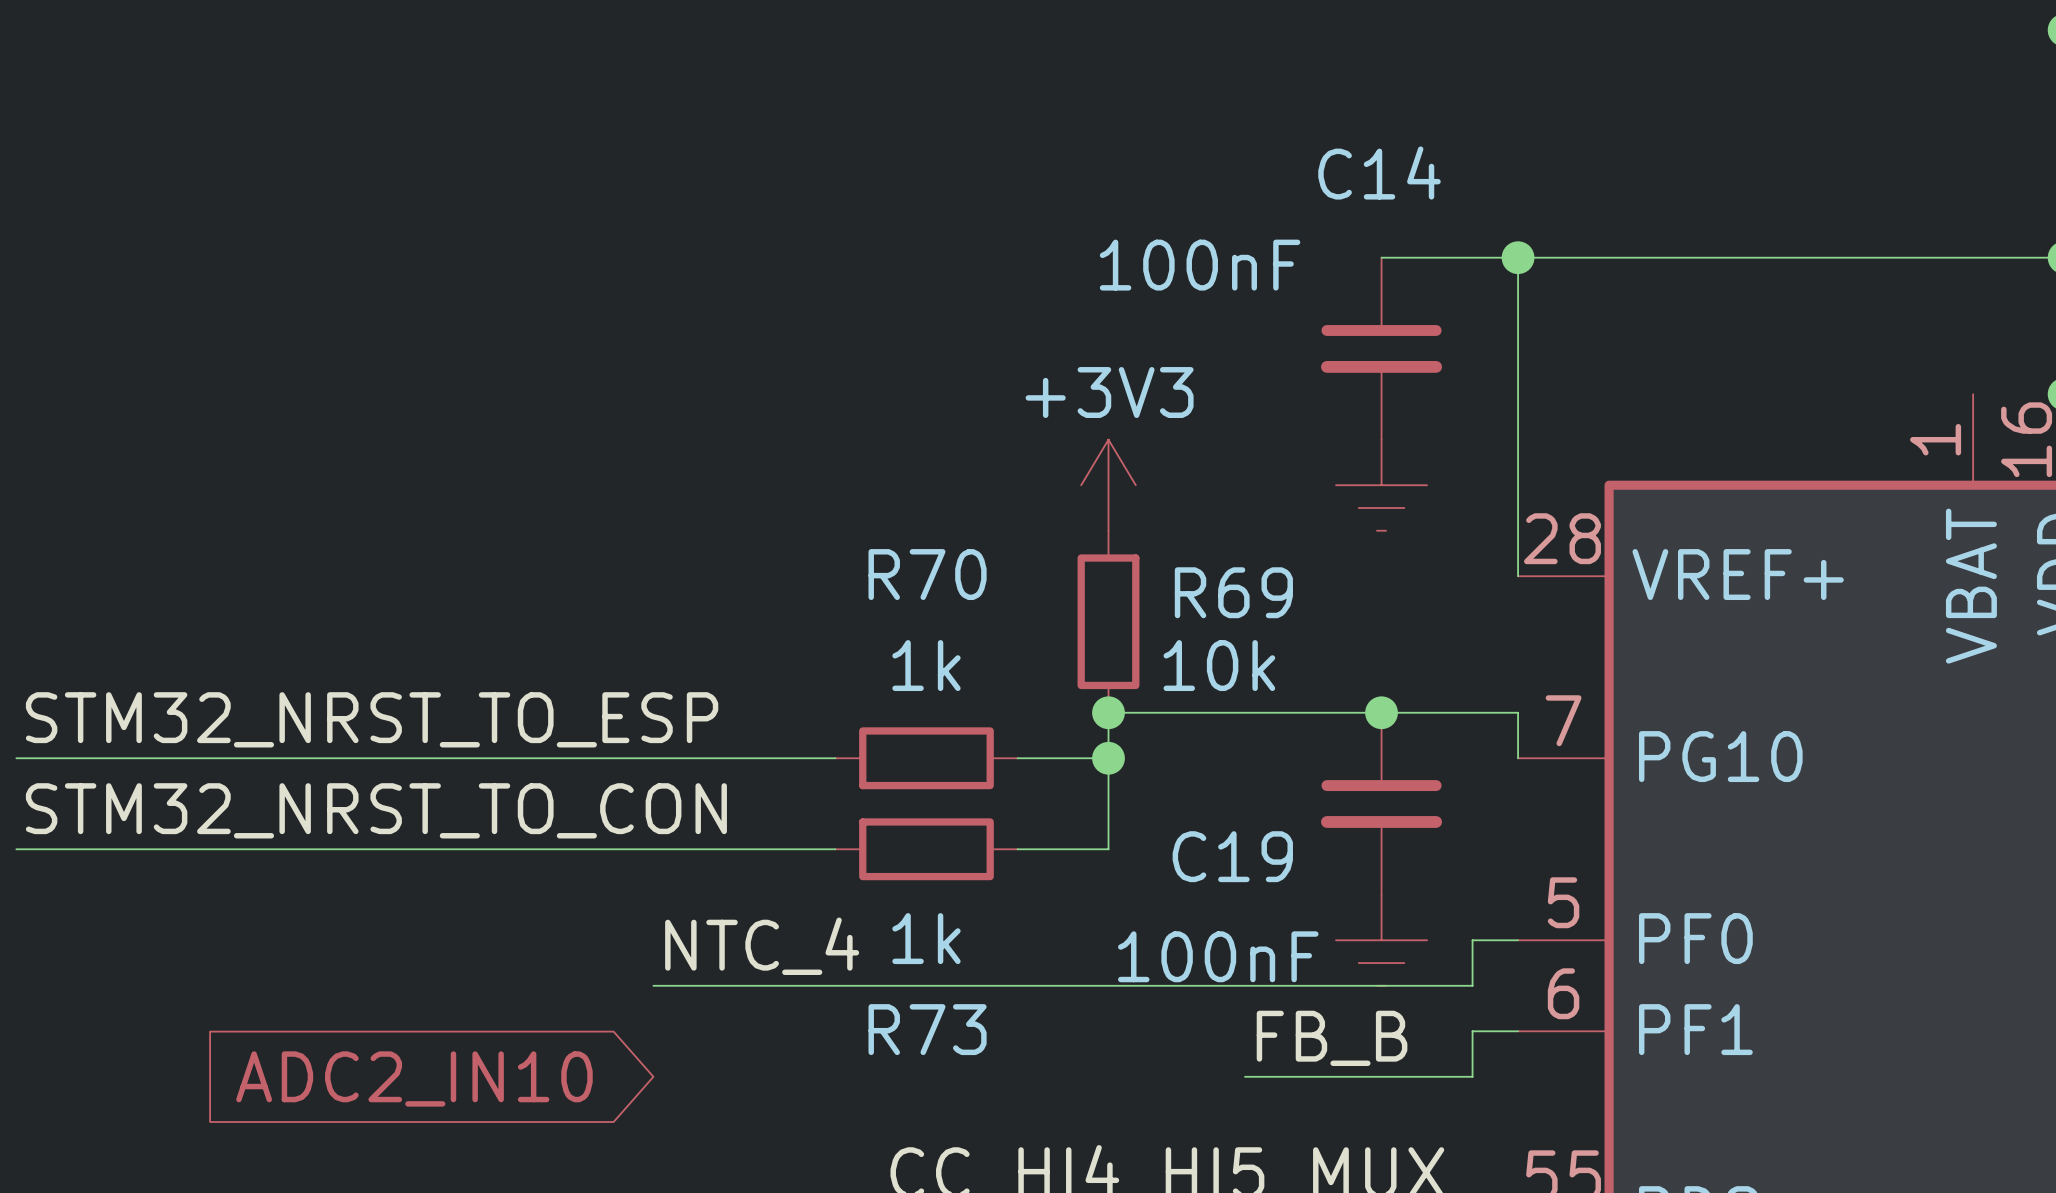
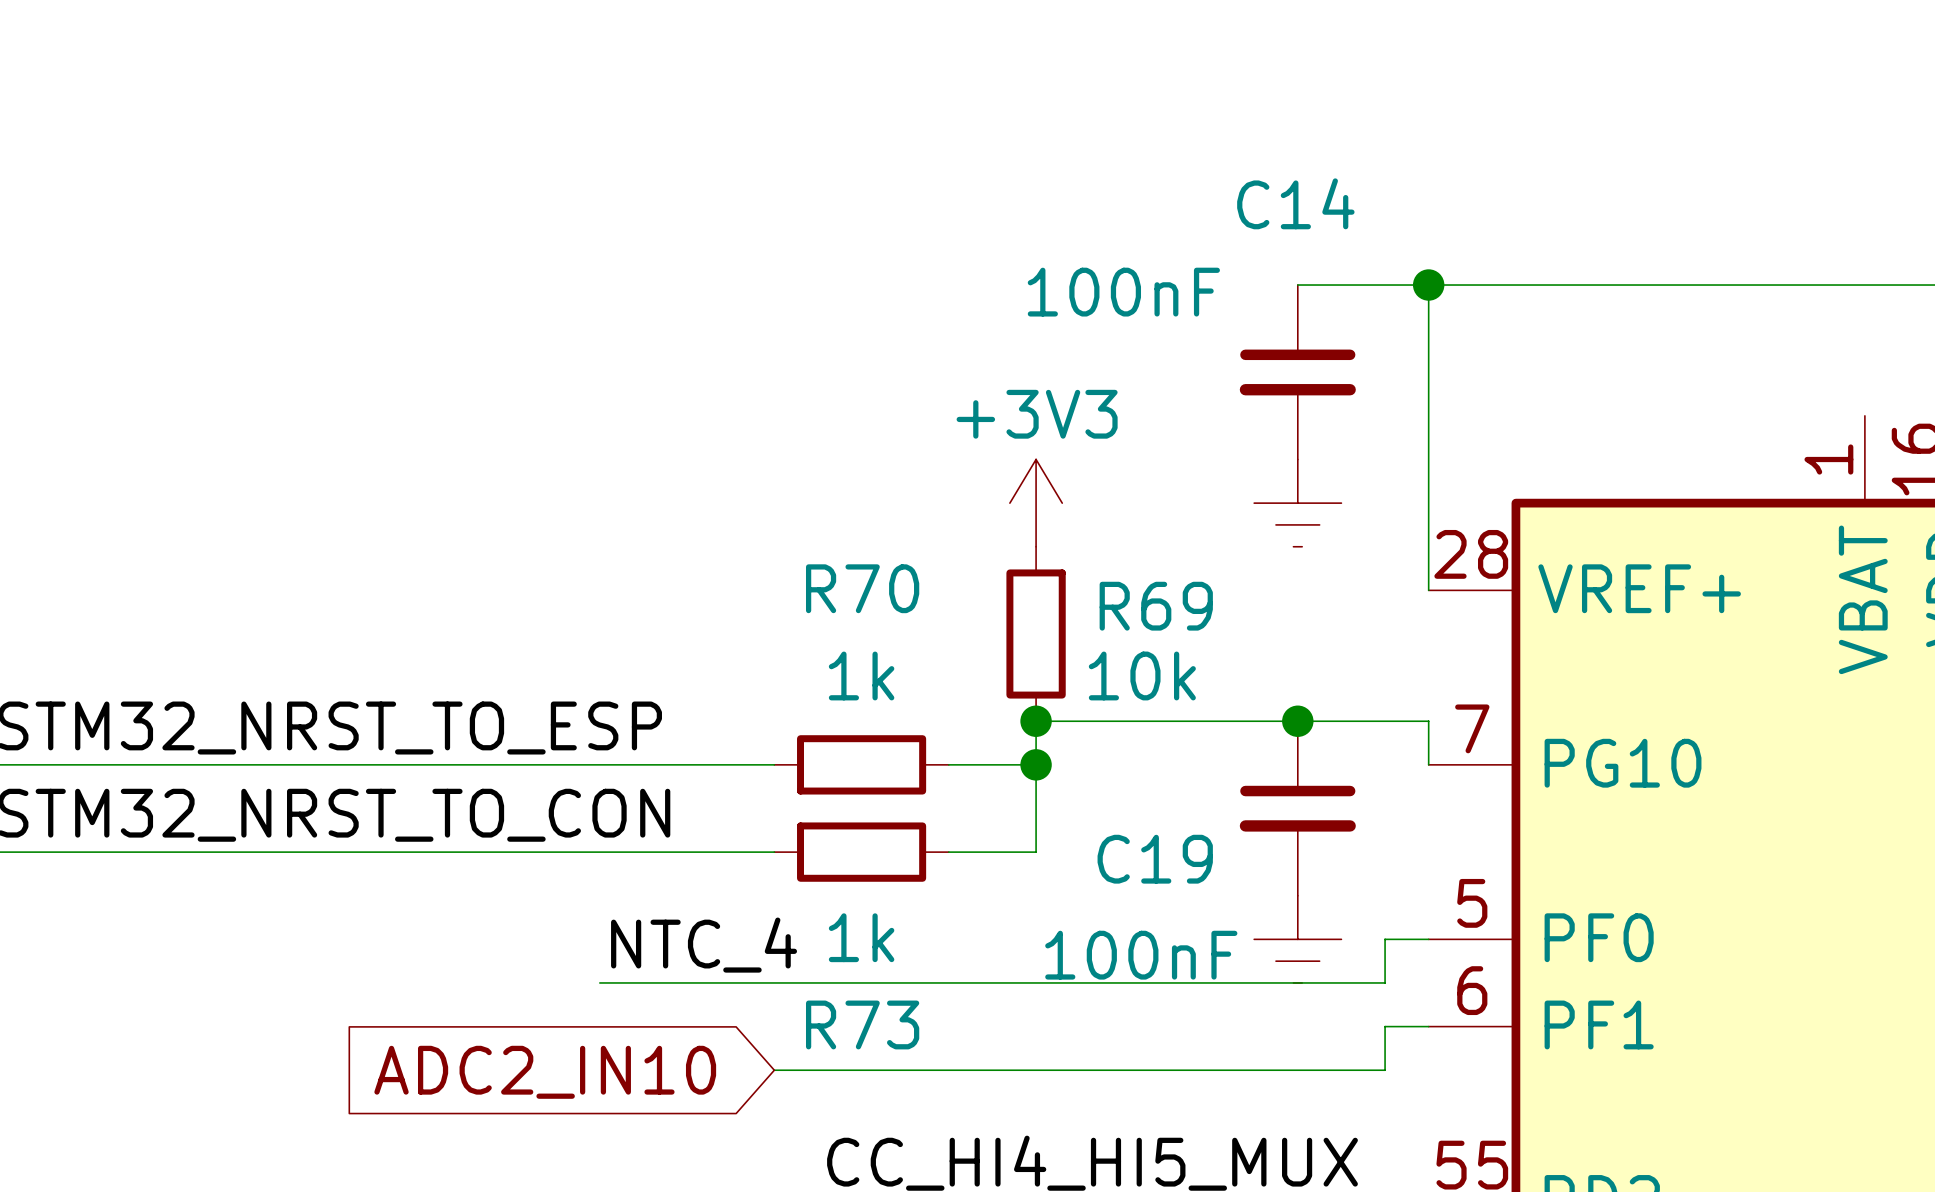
label: FB_B (1332, 1038) -> none
wire: none -> (774, 1070) (1166, 1070)
global label position: ADC2_IN10 (414, 1078) -> ADC2_IN10 (545, 1072)

